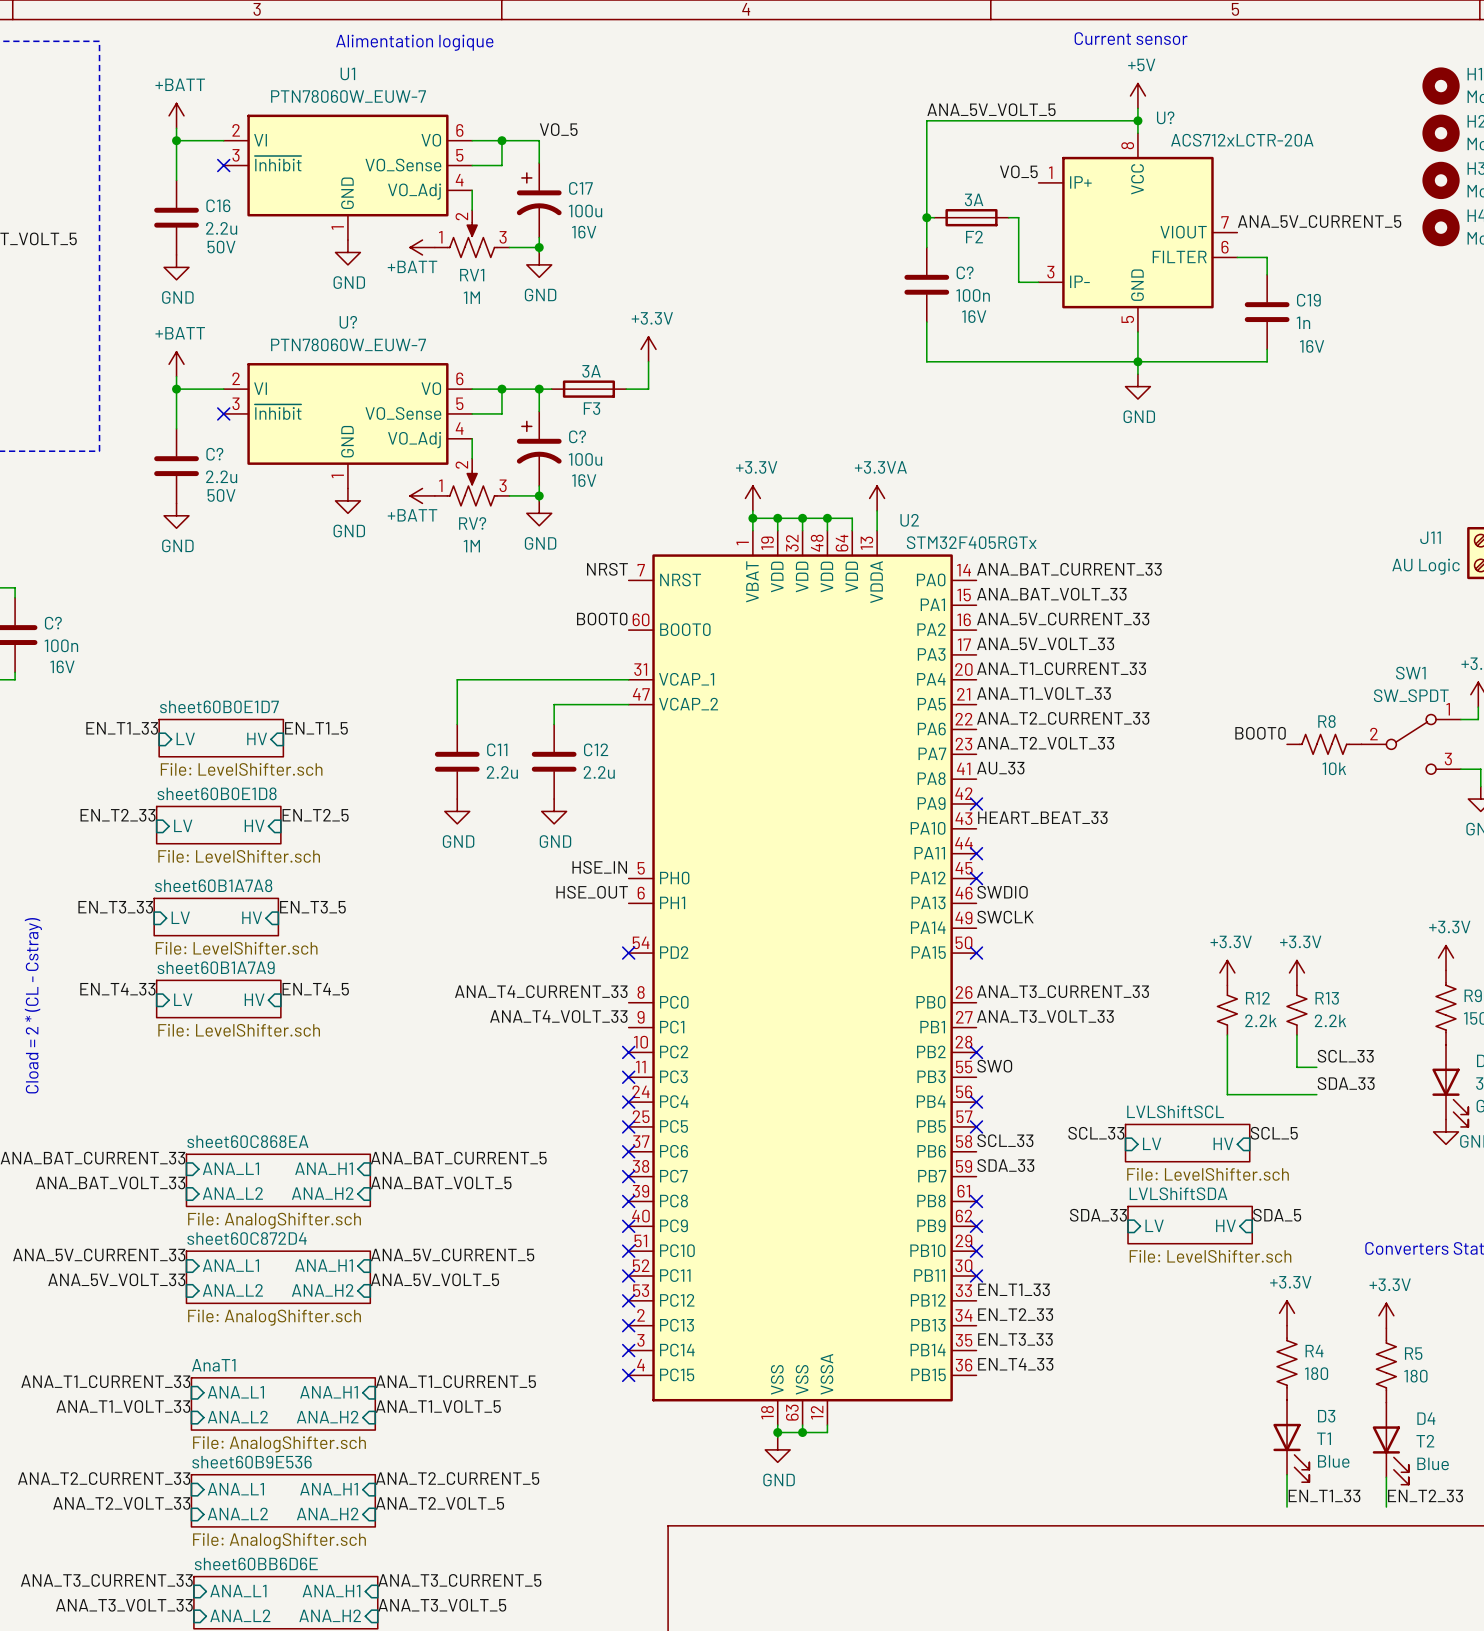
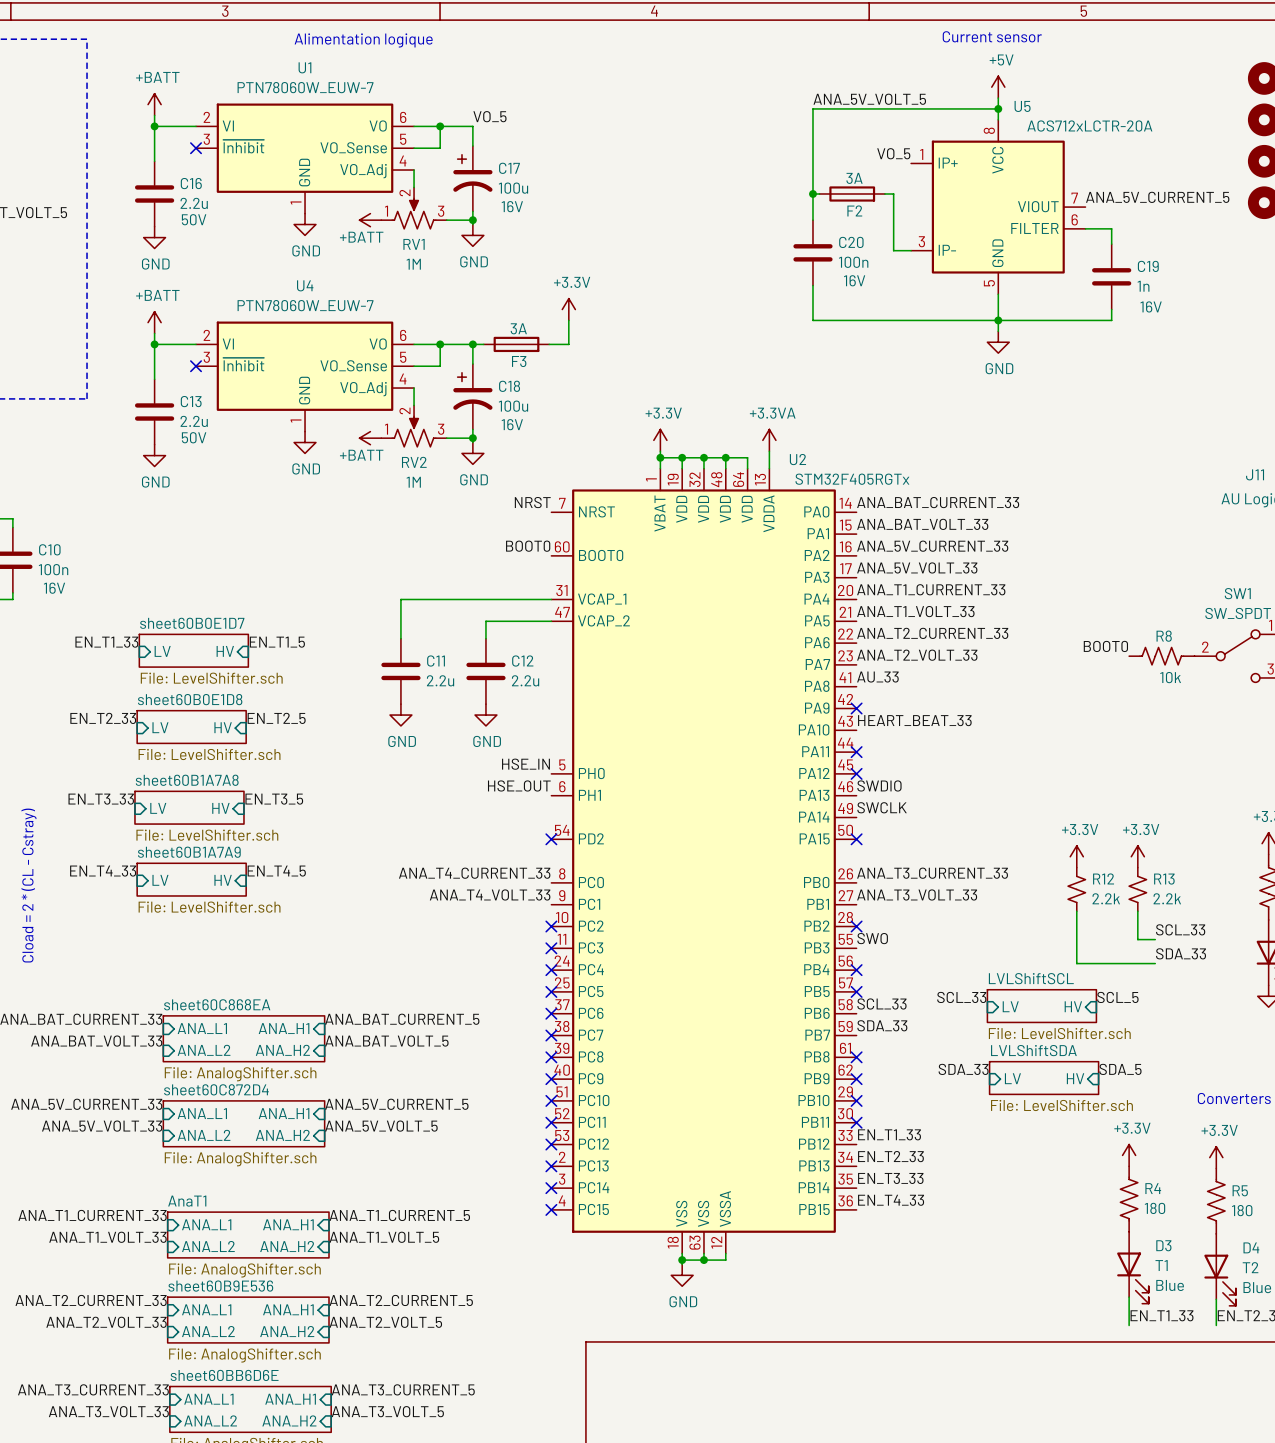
U? name: U? (1165, 117) -> U5 (1022, 106)
C? name: C? (965, 272) -> C20 (851, 242)
U? name: U? (348, 322) -> U4 (305, 285)
C? name: C? (577, 436) -> C18 (509, 386)
C? name: C? (214, 454) -> C13 (191, 401)
RV? name: RV? (472, 523) -> RV2 (414, 462)
C? name: C? (53, 623) -> C10 (49, 549)

